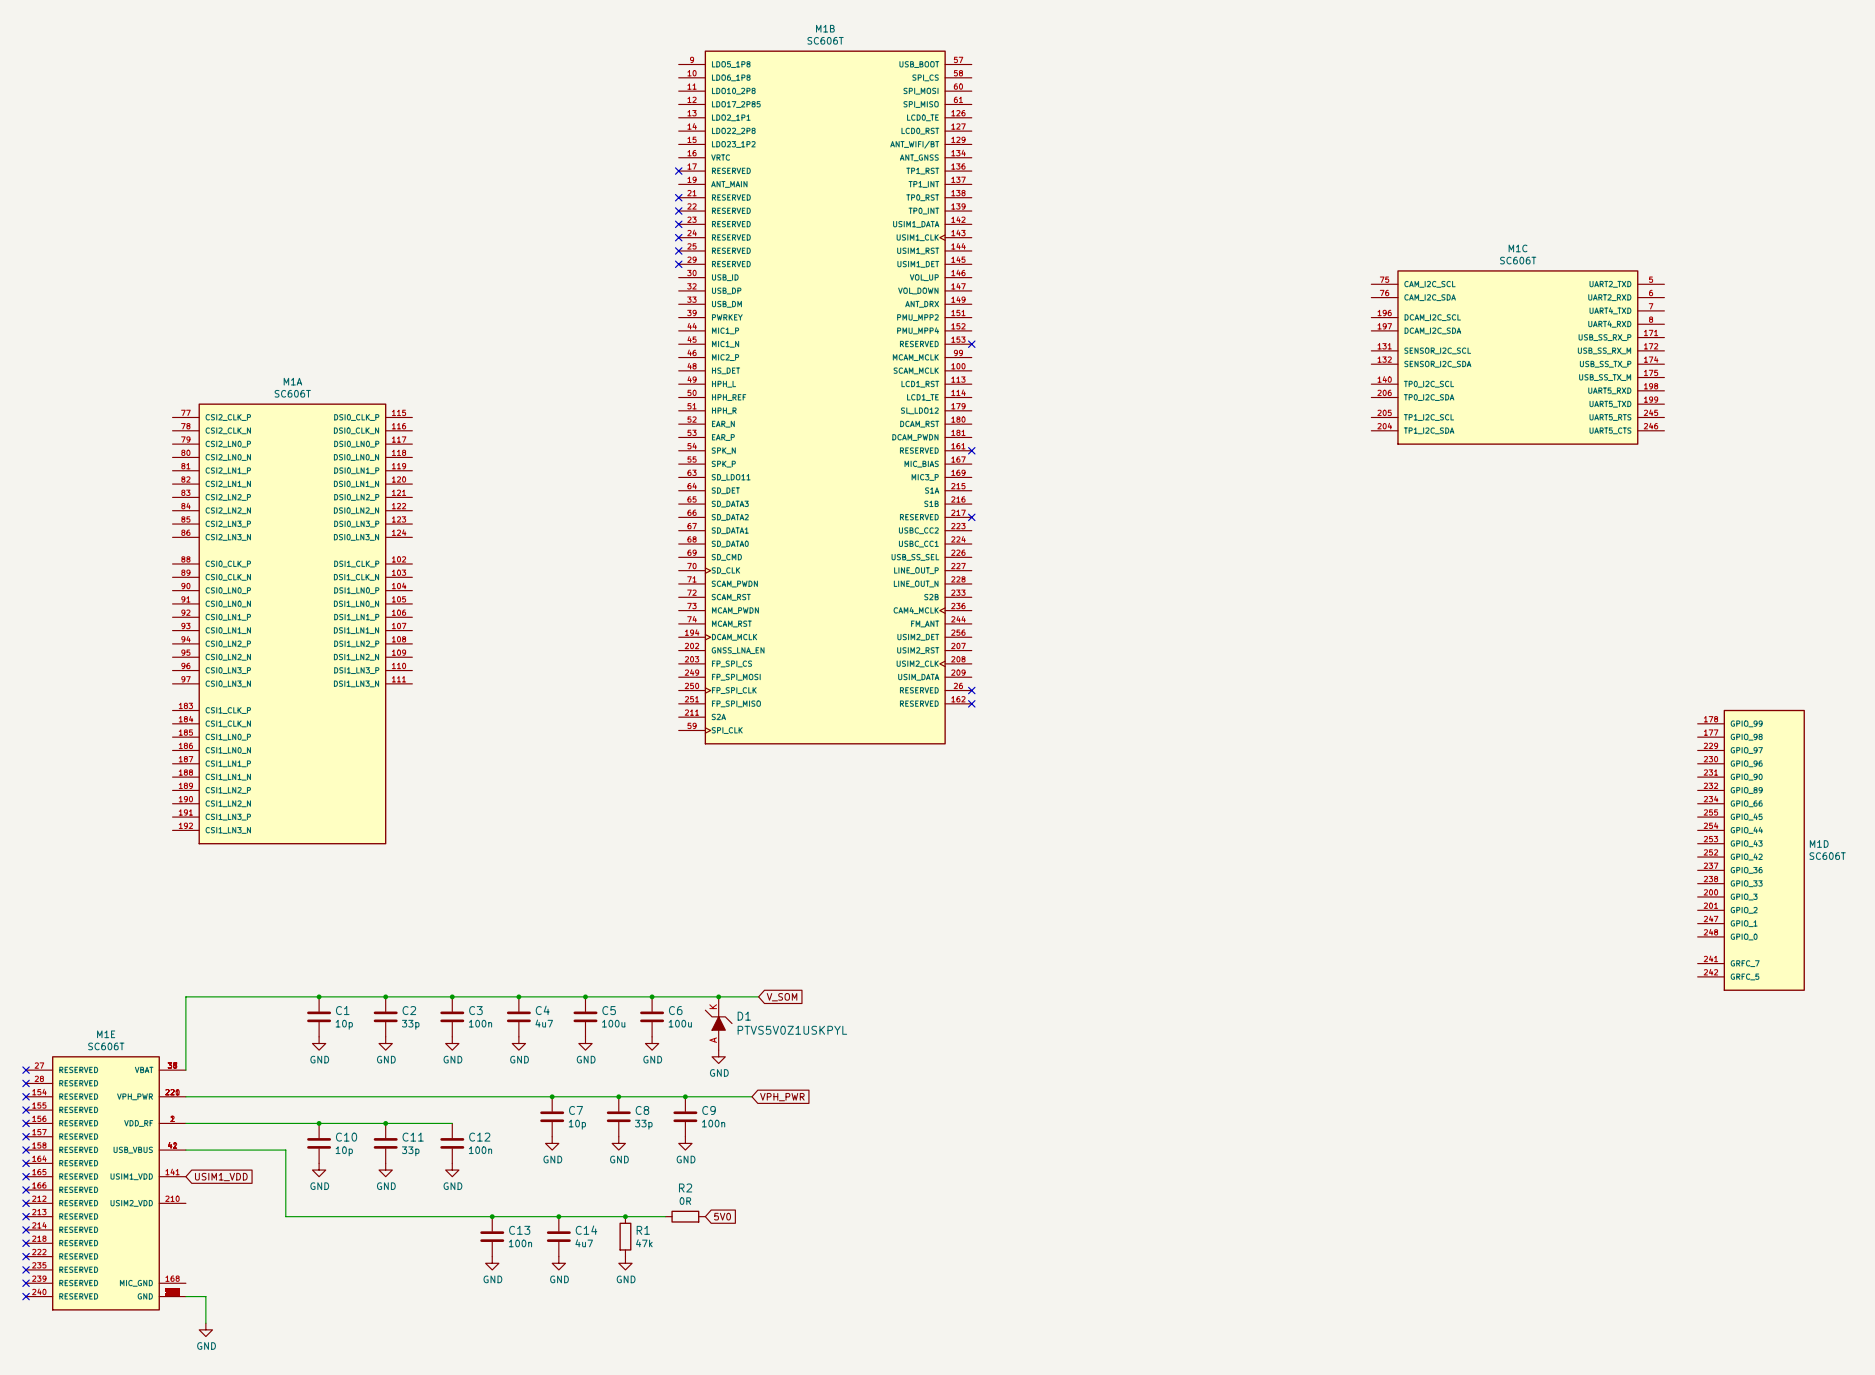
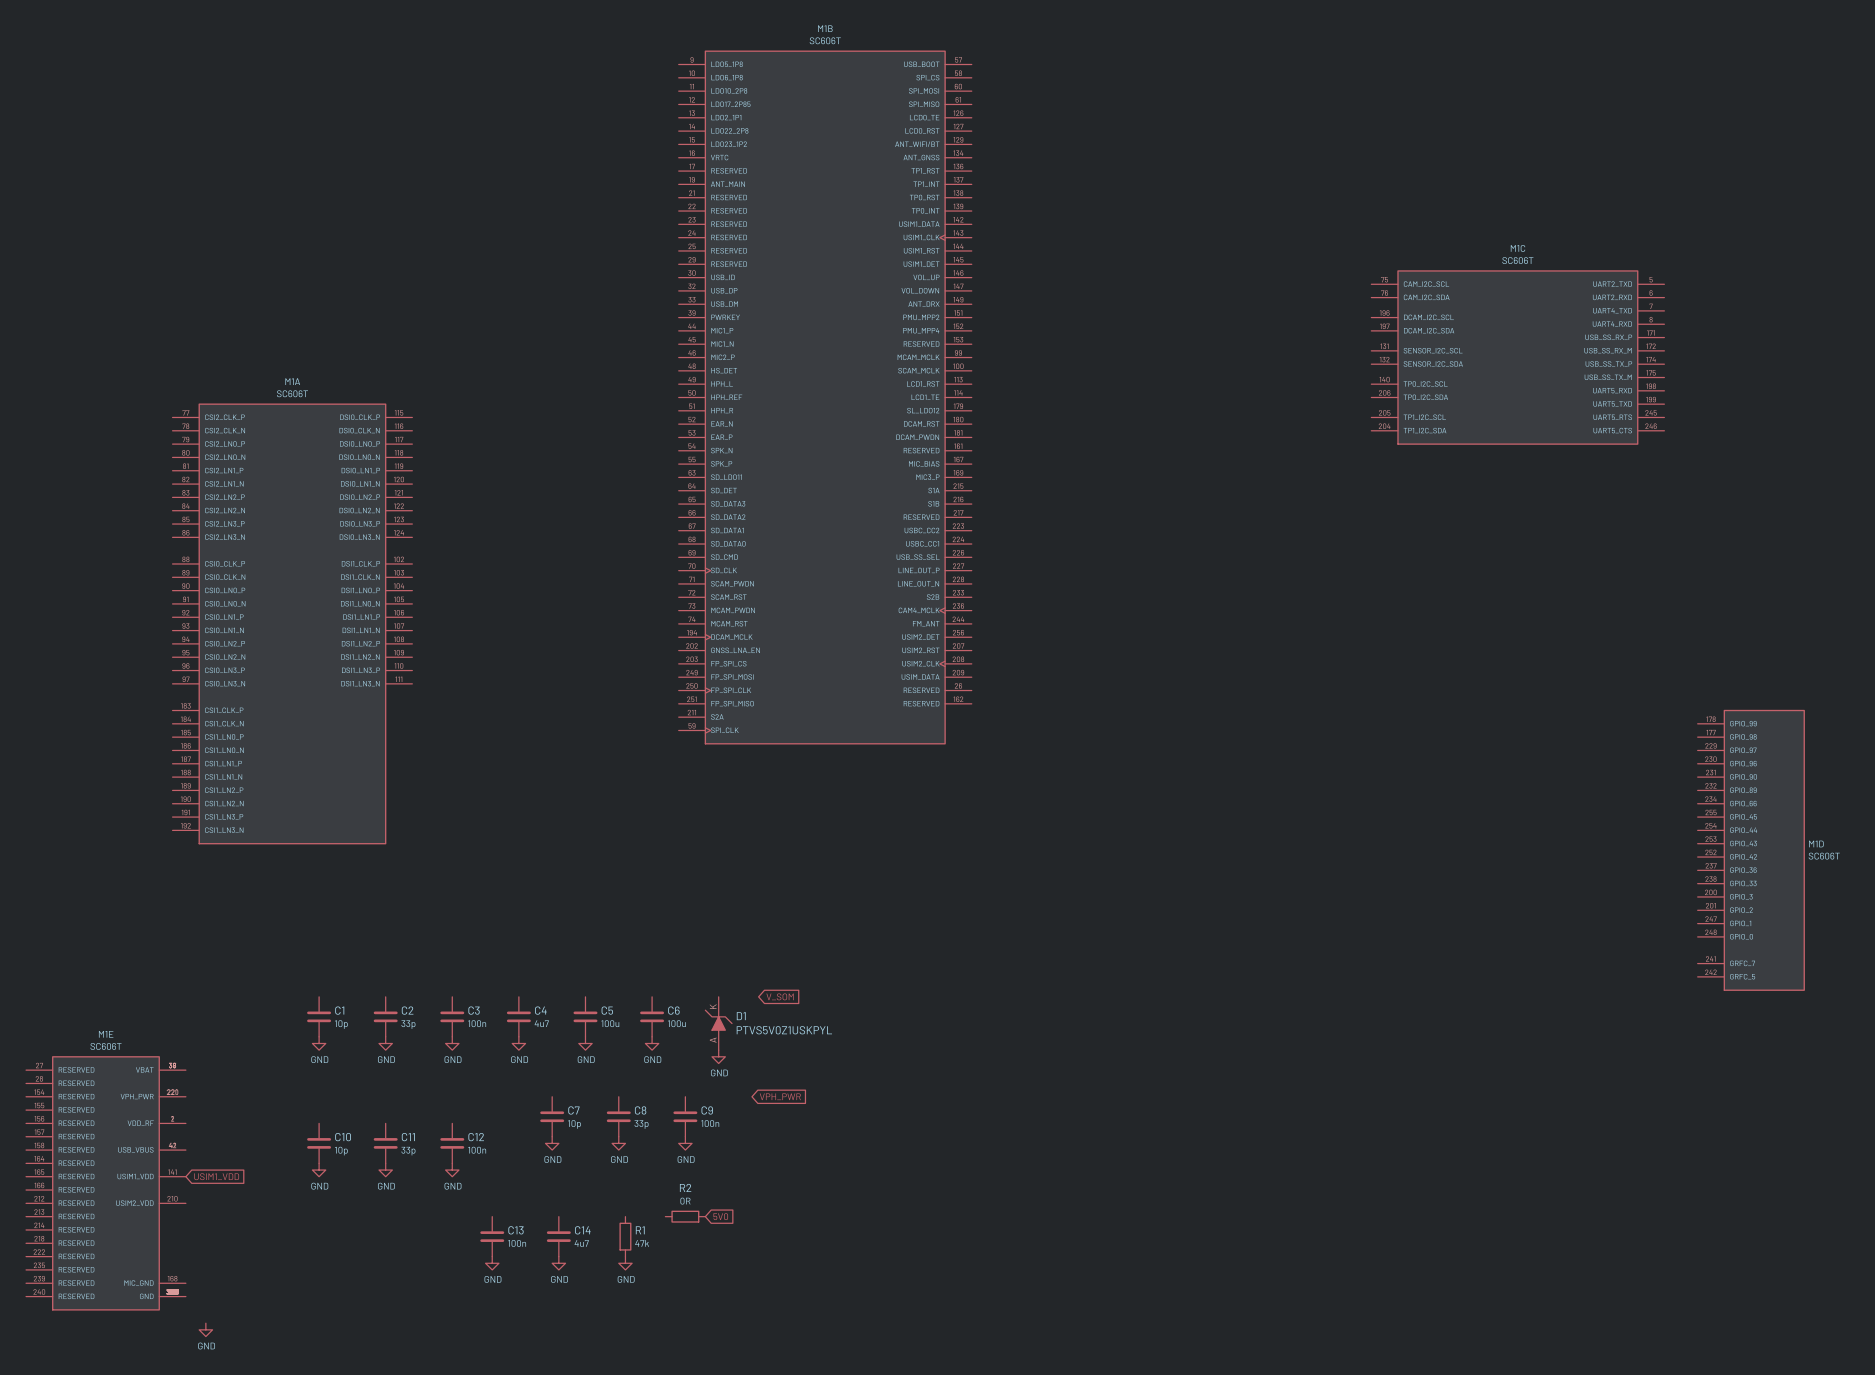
no-connect mark: (678, 171) -> none
no-connect mark: (678, 197) -> none
no-connect mark: (678, 211) -> none
no-connect mark: (678, 224) -> none
no-connect mark: (678, 237) -> none
no-connect mark: (678, 250) -> none
no-connect mark: (678, 264) -> none
no-connect mark: (971, 344) -> none
no-connect mark: (971, 450) -> none
no-connect mark: (971, 517) -> none
no-connect mark: (971, 690) -> none
no-connect mark: (971, 703) -> none
junction: (319, 996) -> none
junction: (385, 996) -> none
junction: (452, 996) -> none
junction: (518, 996) -> none
junction: (585, 996) -> none
junction: (652, 996) -> none
junction: (718, 996) -> none
wire: (758, 996) (185, 996) (185, 1070) -> none
no-connect mark: (26, 1070) -> none
no-connect mark: (26, 1083) -> none
no-connect mark: (26, 1096) -> none
wire: (185, 1096) (751, 1096) -> none
junction: (552, 1096) -> none
junction: (618, 1096) -> none
junction: (685, 1096) -> none
no-connect mark: (26, 1110) -> none
no-connect mark: (26, 1123) -> none
wire: (185, 1123) (452, 1123) -> none
junction: (319, 1123) -> none
junction: (385, 1123) -> none
no-connect mark: (26, 1136) -> none
no-connect mark: (26, 1150) -> none
wire: (185, 1150) (285, 1150) (285, 1216) (665, 1216) -> none
no-connect mark: (26, 1163) -> none
no-connect mark: (26, 1176) -> none
no-connect mark: (26, 1190) -> none
no-connect mark: (26, 1203) -> none
no-connect mark: (26, 1216) -> none
junction: (492, 1216) -> none
junction: (558, 1216) -> none
junction: (625, 1216) -> none
no-connect mark: (26, 1229) -> none
no-connect mark: (26, 1243) -> none
no-connect mark: (26, 1256) -> none
no-connect mark: (26, 1269) -> none
no-connect mark: (26, 1283) -> none
no-connect mark: (26, 1296) -> none
wire: (185, 1296) (205, 1296) (205, 1323) -> none

